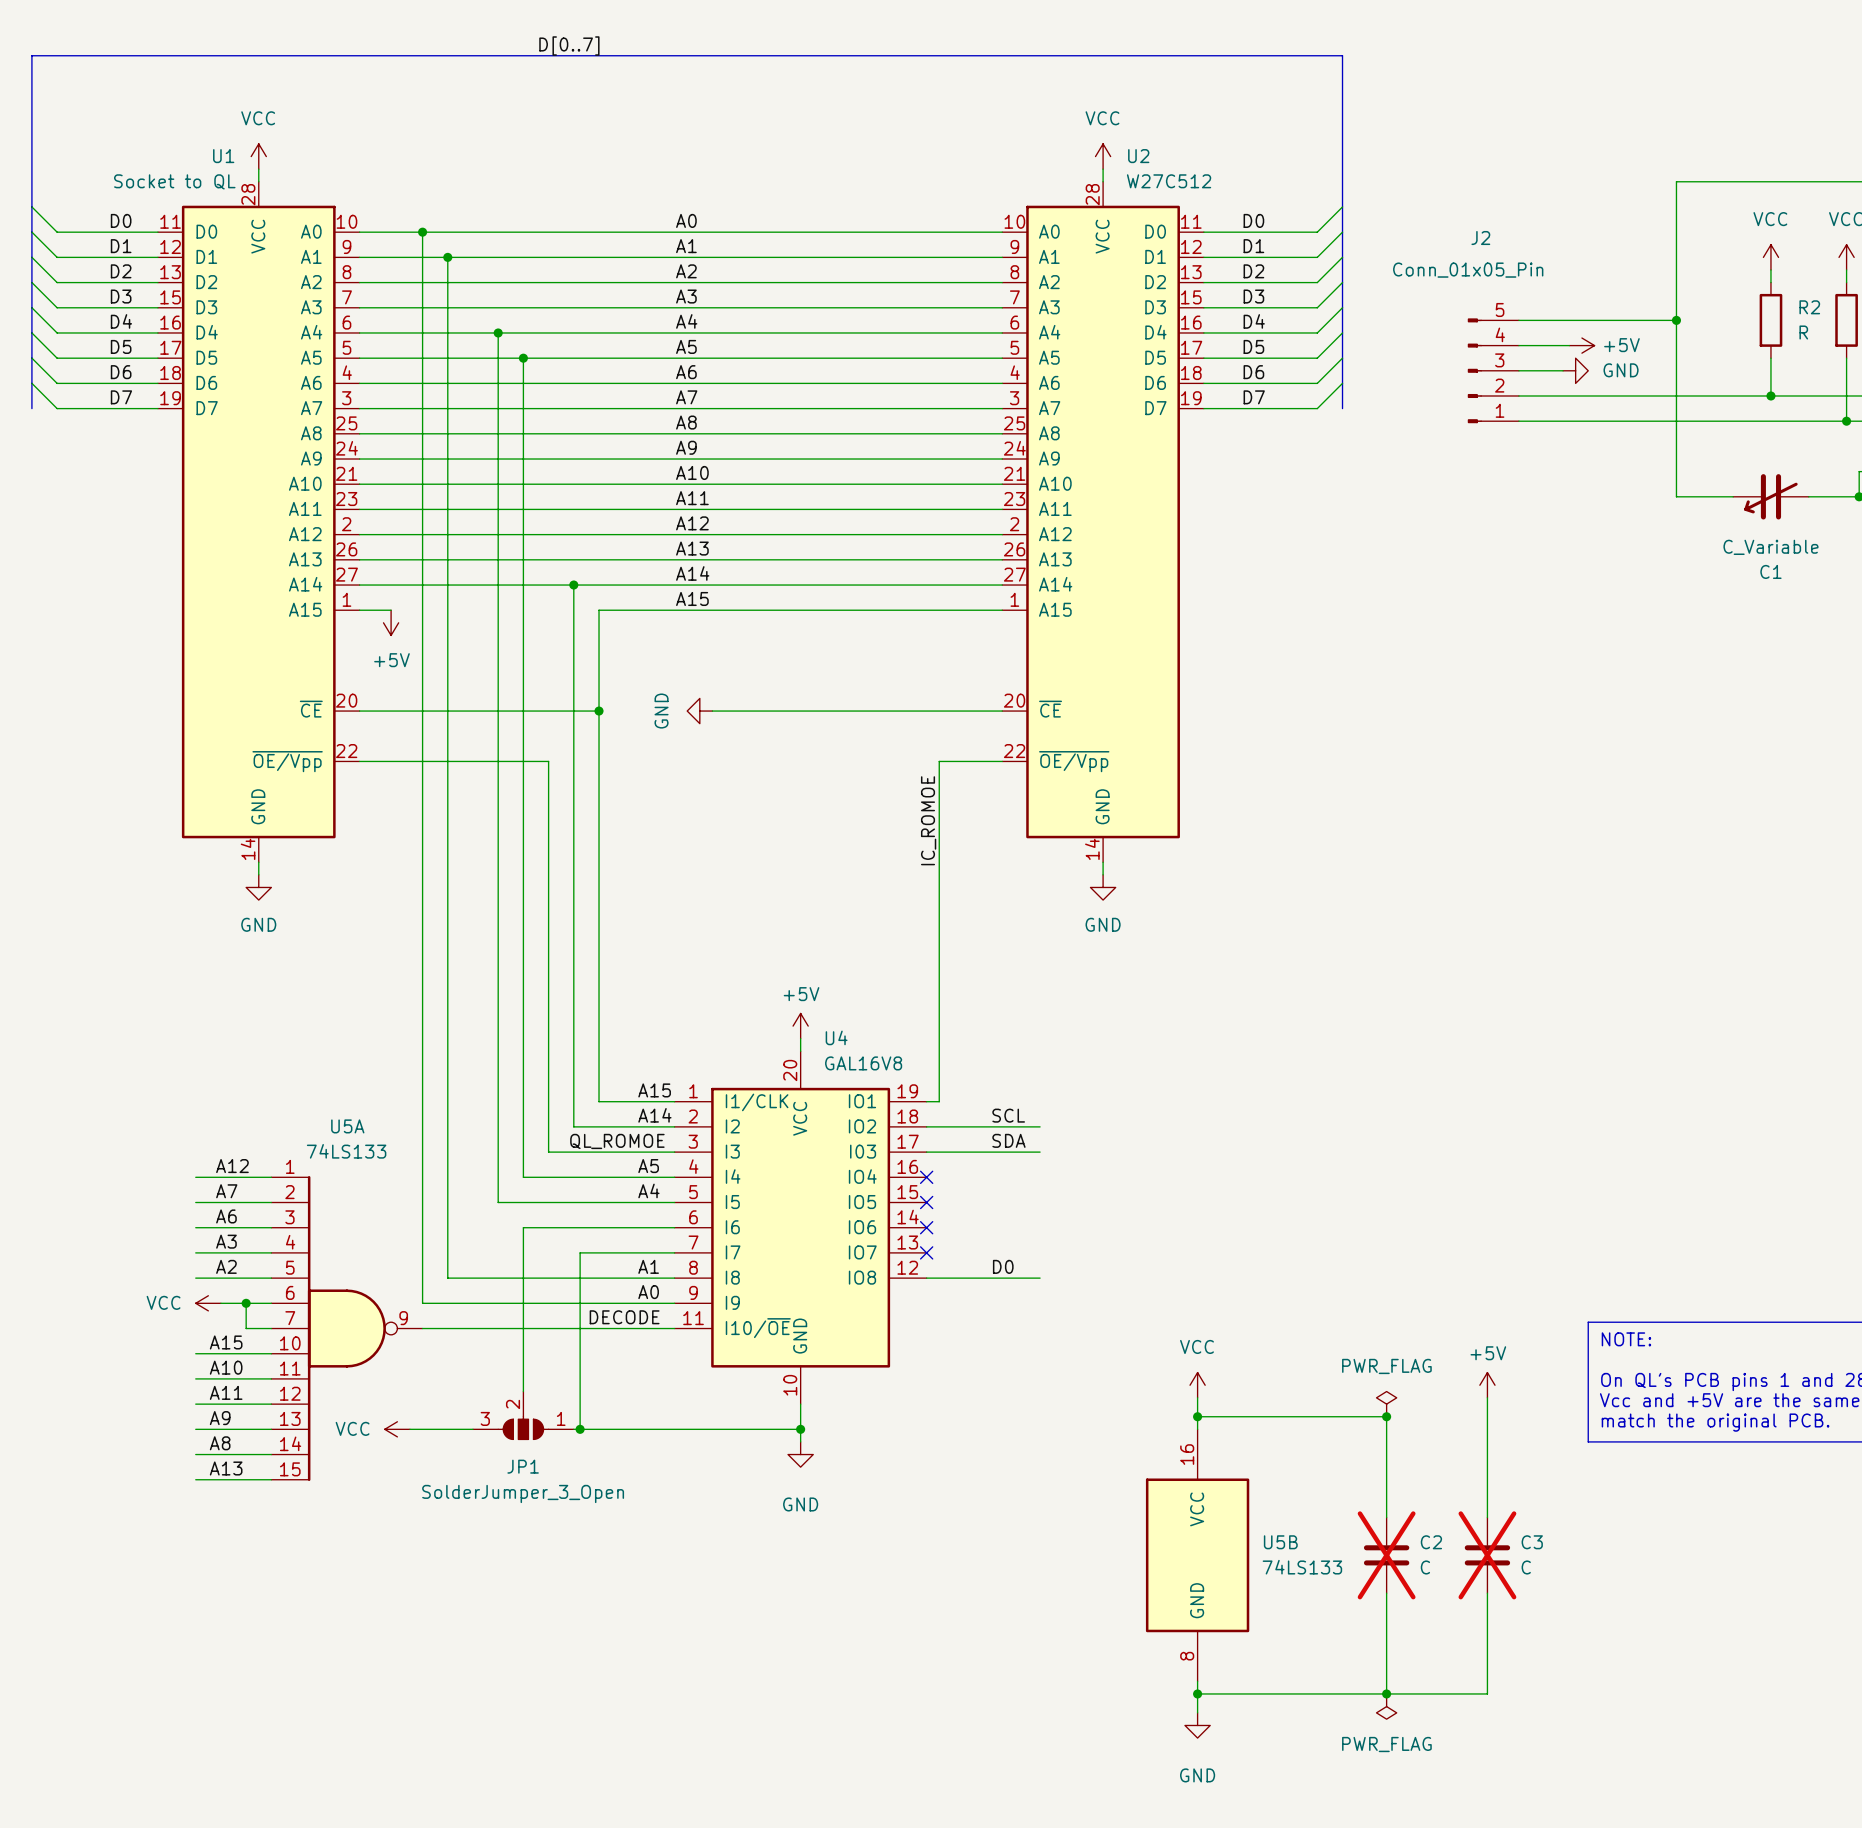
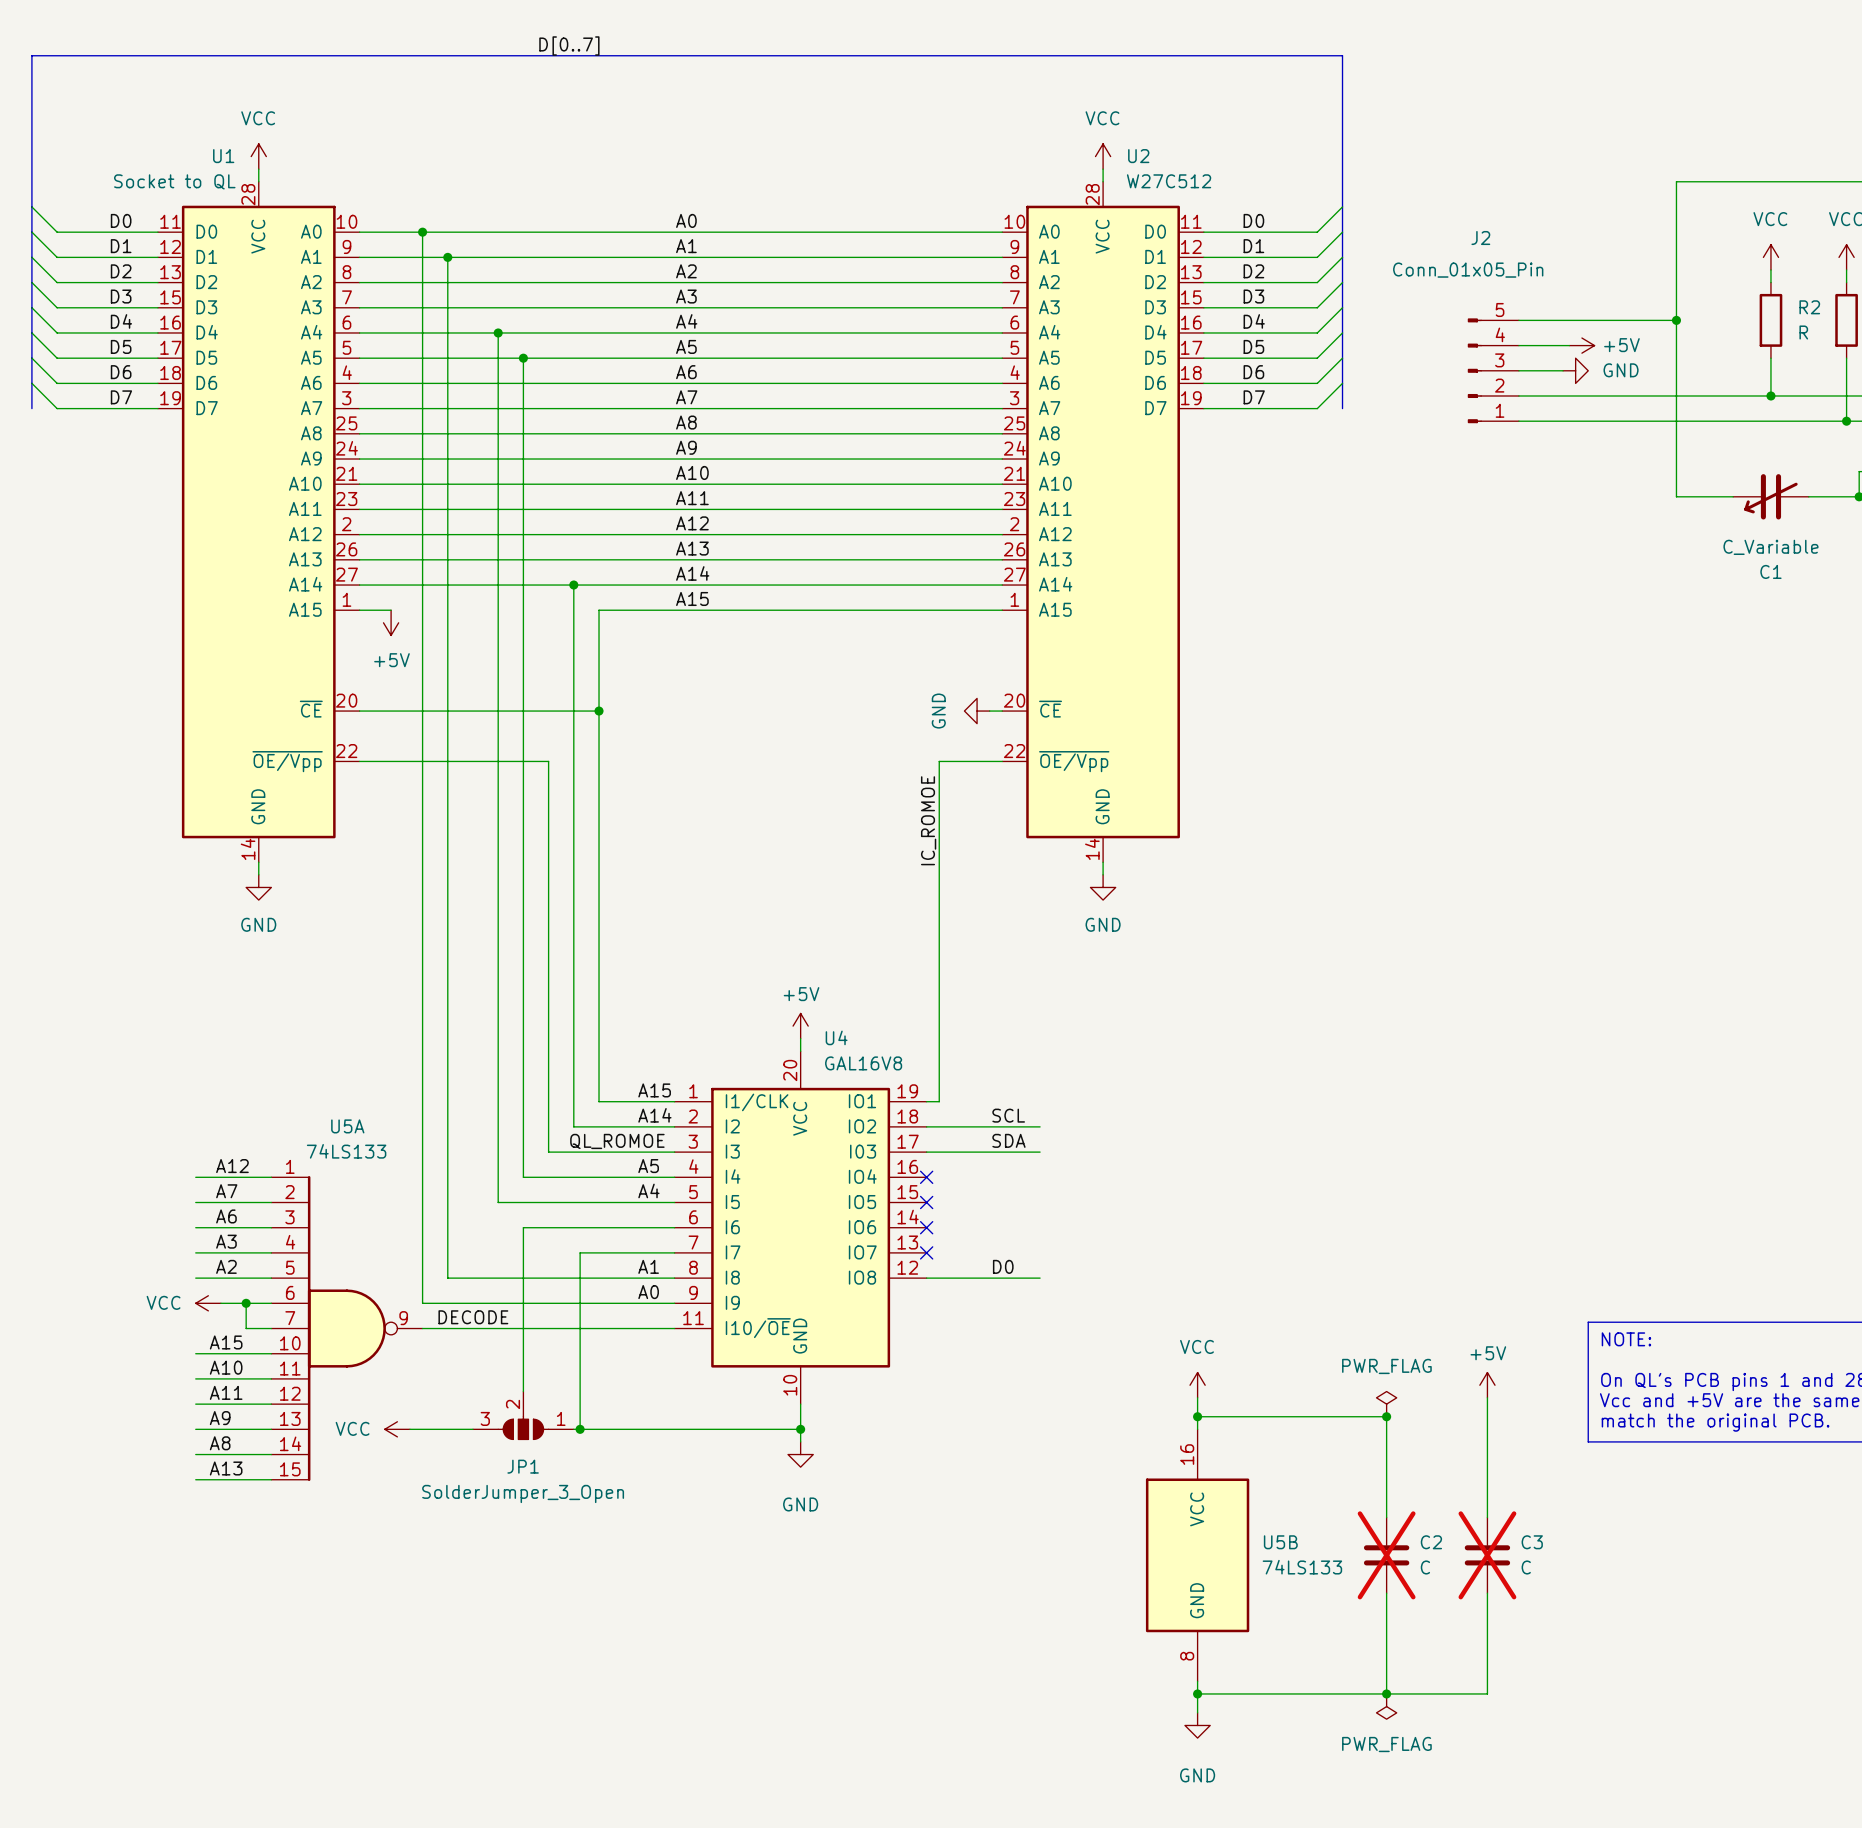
power symbol: GND (699, 711) -> none
wire: (712, 711) (989, 711) -> none
power symbol: none -> GND (977, 711)
label position: DECODE (624, 1317) -> DECODE (473, 1317)

